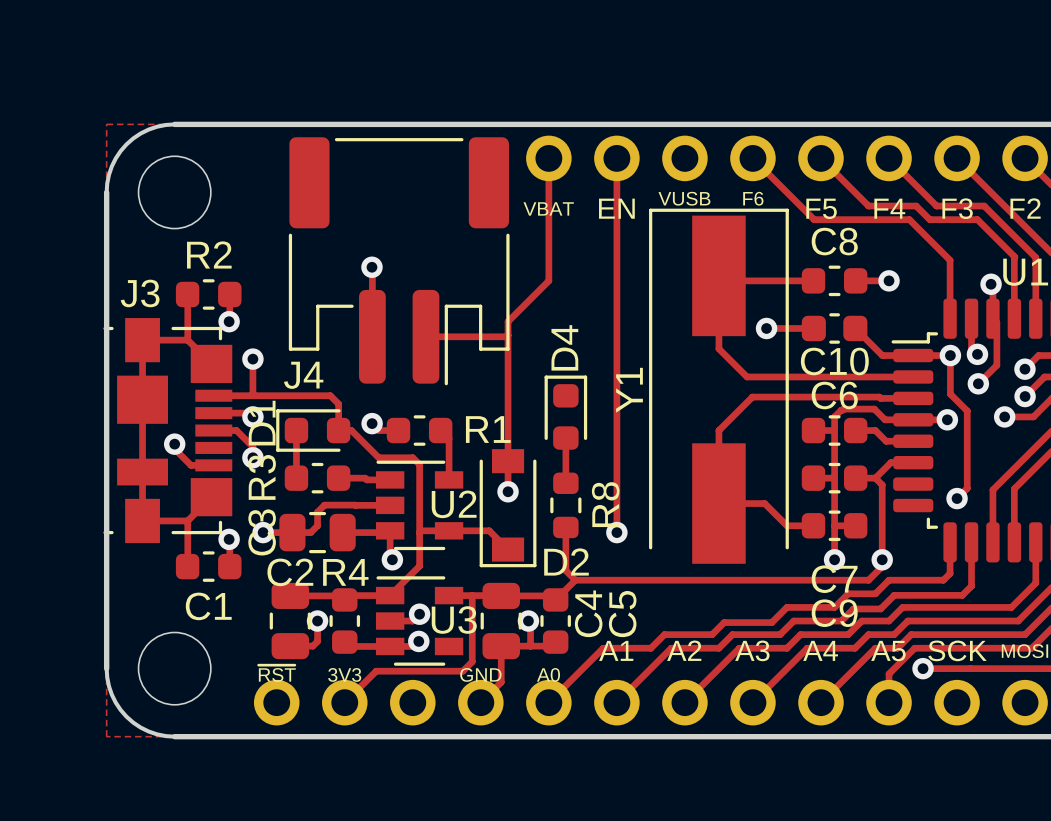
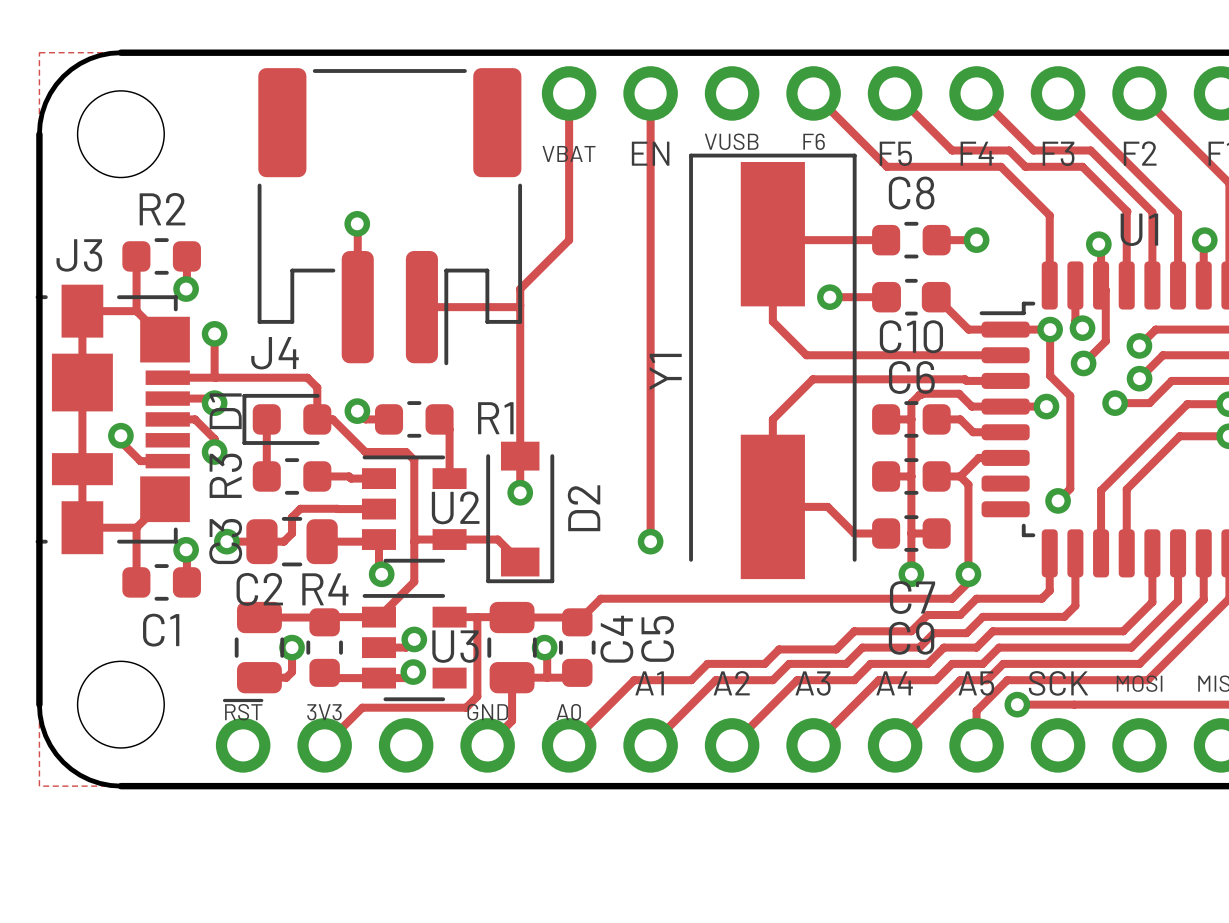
D4: (565, 412) -> none
track: (565, 438) (565, 483) -> none
R8: (565, 505) -> none
track: (565, 527) (565, 570) (575, 580) -> none
D2 name rotation: 0° (566, 561) -> 90° counterclockwise (584, 508)

